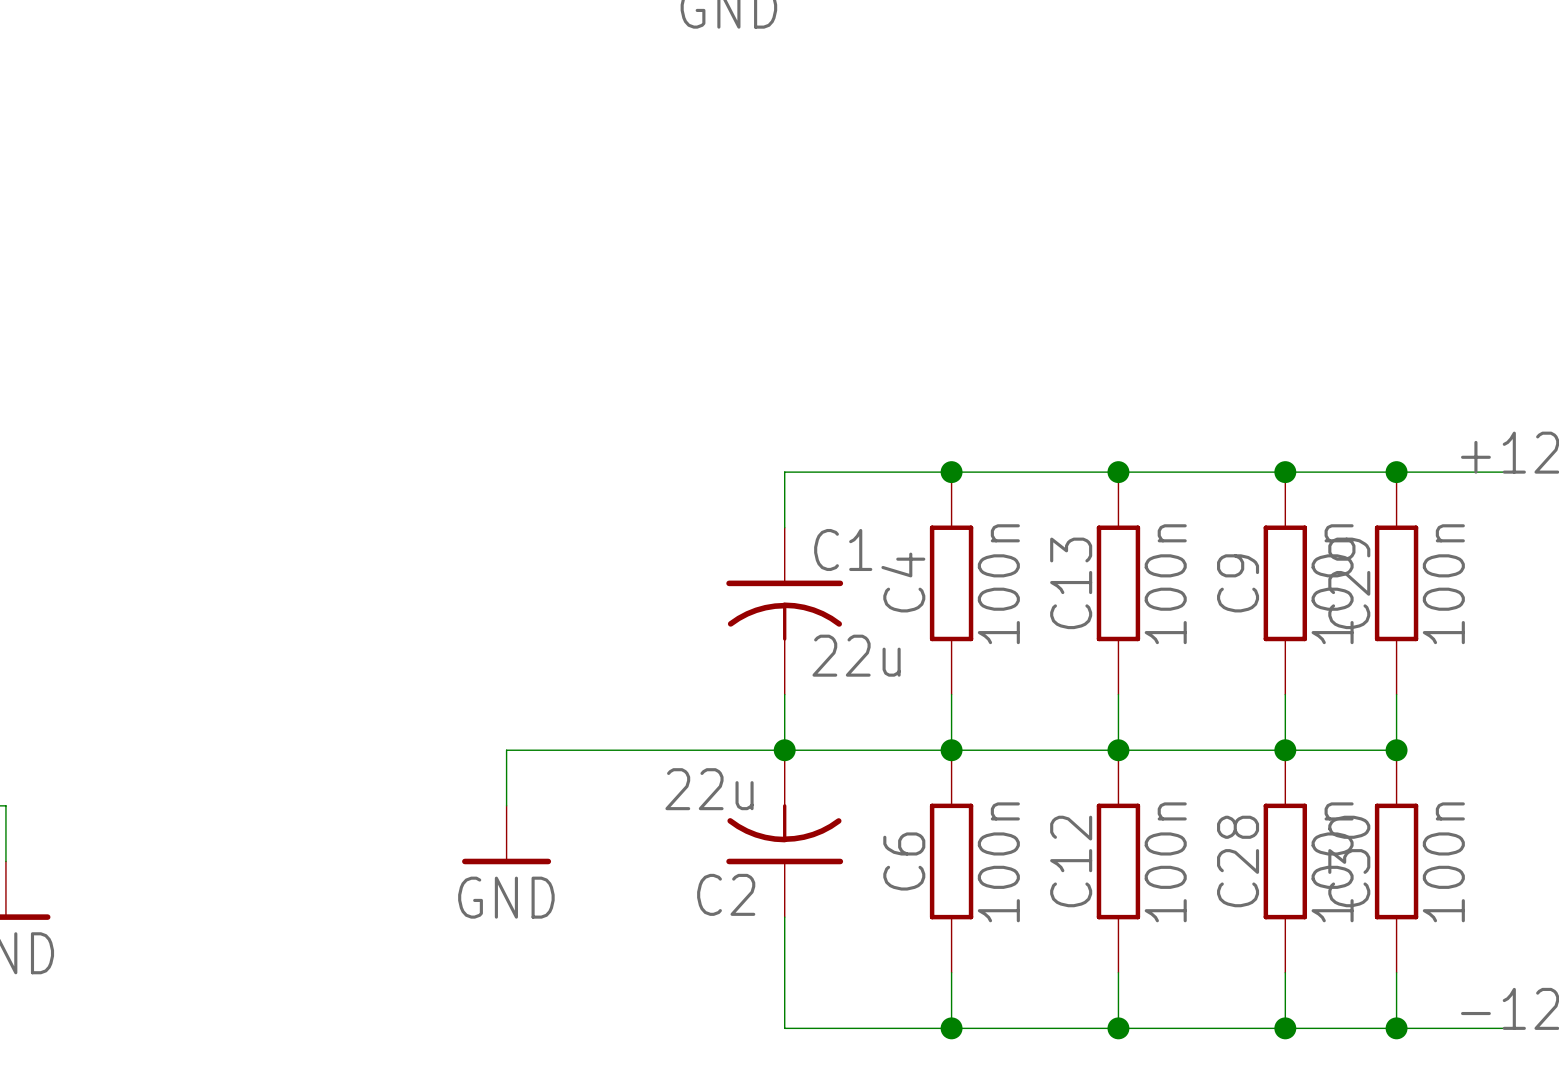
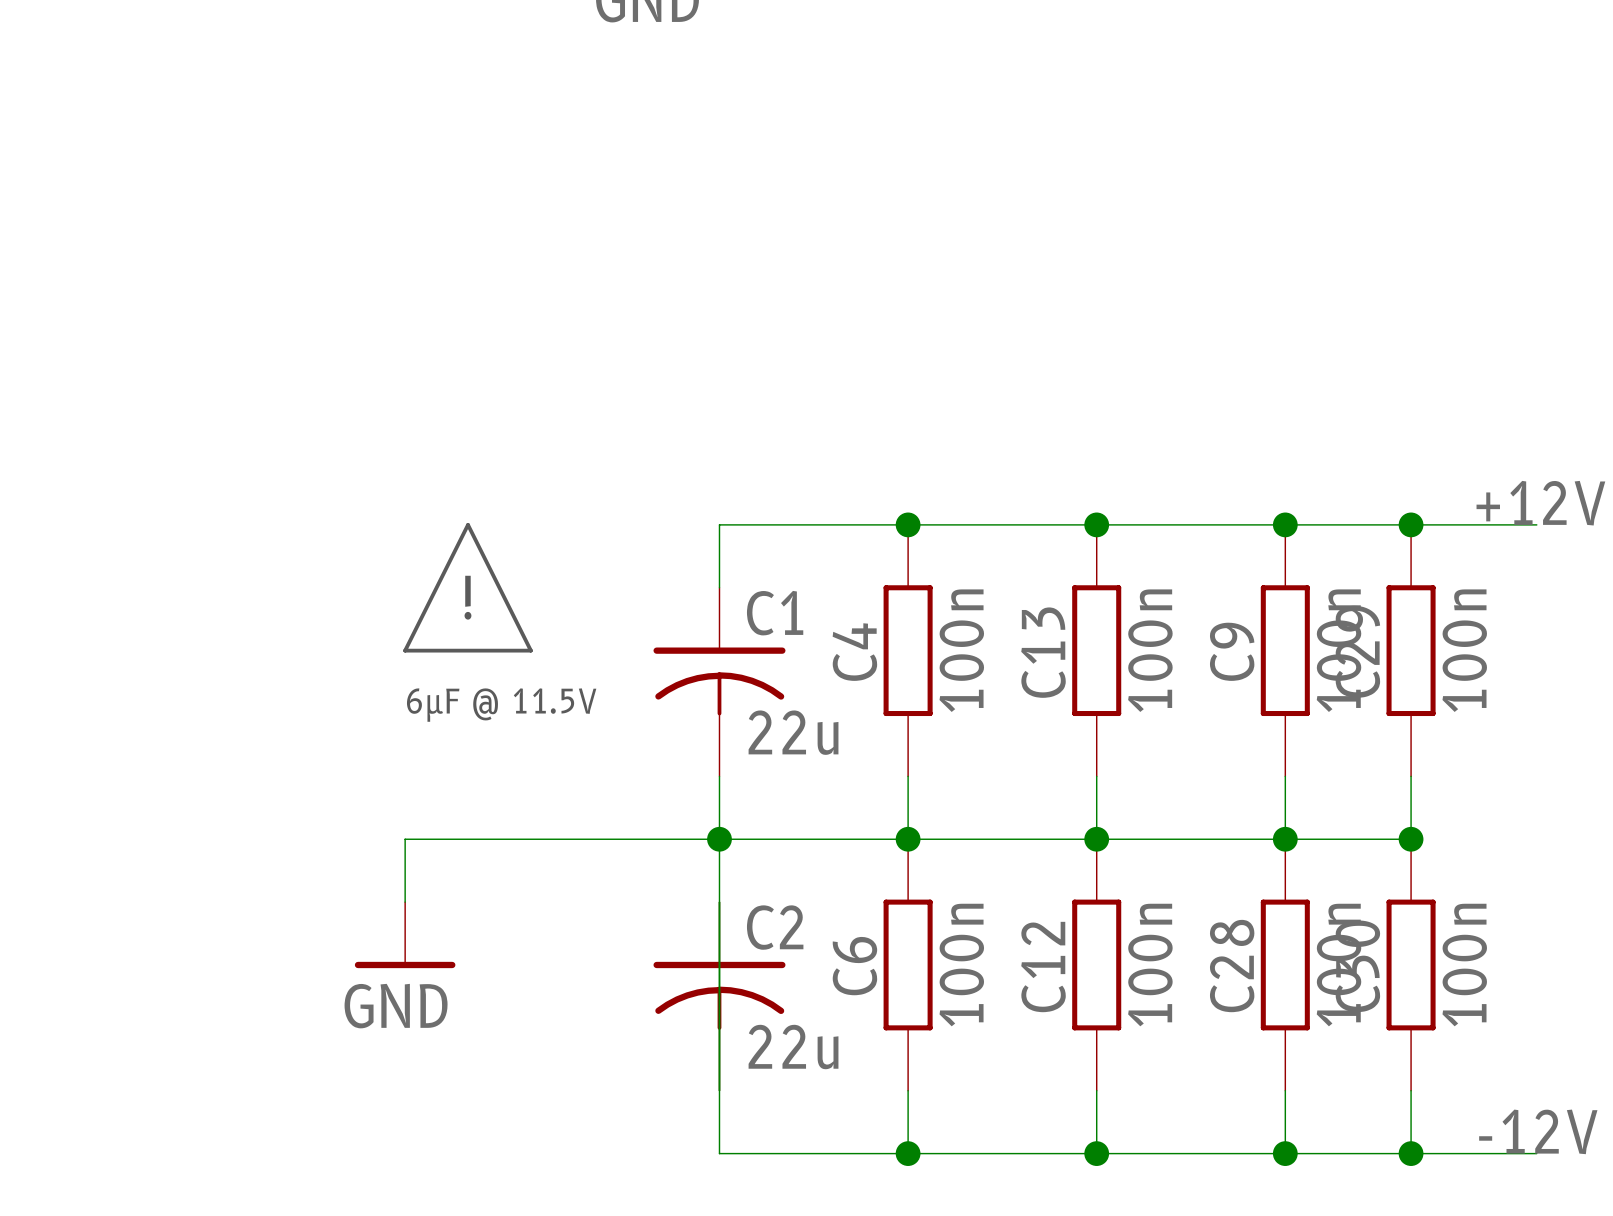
line: none -> (468, 524) (405, 650) (530, 650) (468, 524)
text: none -> ! (467, 597)
text: none -> 6µF @ 11.5V (501, 705)
C2 rotation: 0° (784, 834) -> 180° (719, 995)

